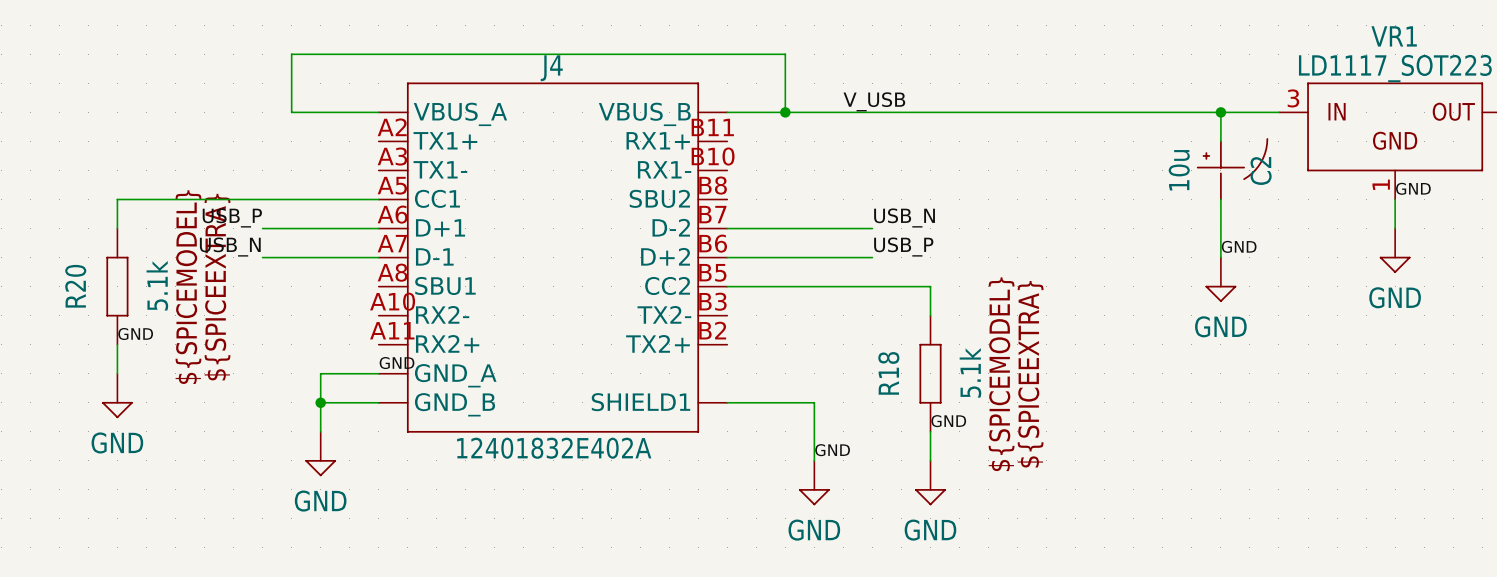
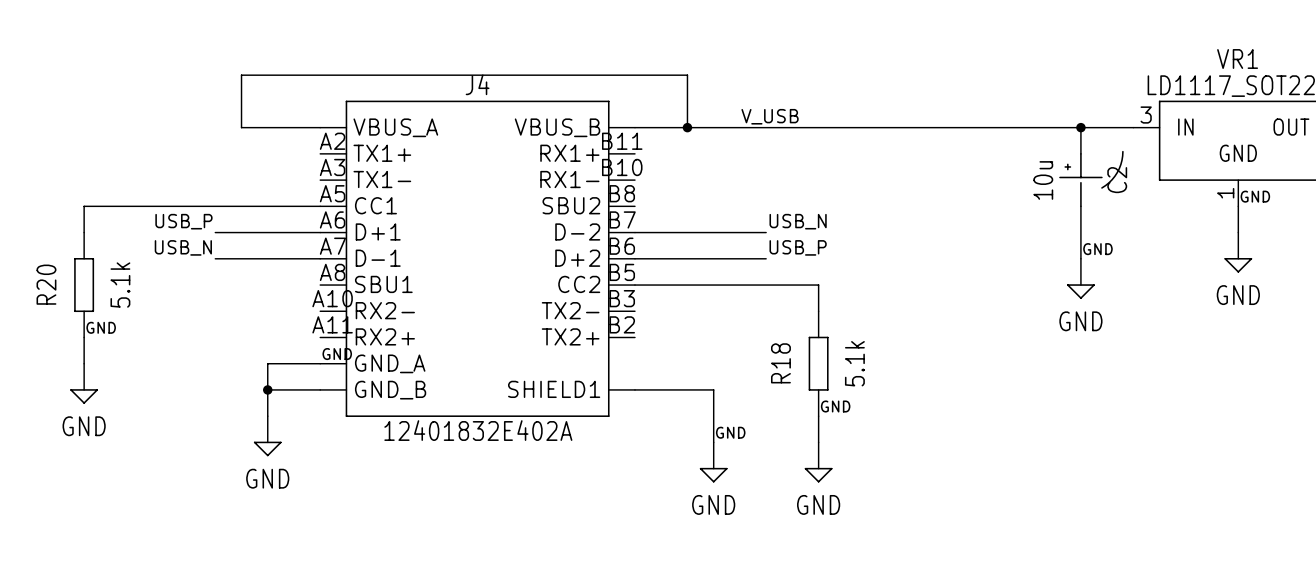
R20 text: ${SPICEMODEL} (188, 287) -> none
R20 text: ${SPICEEXTRA} (217, 287) -> none
R18 text: ${SPICEMODEL} (1001, 374) -> none
R18 text: ${SPICEEXTRA} (1030, 374) -> none

